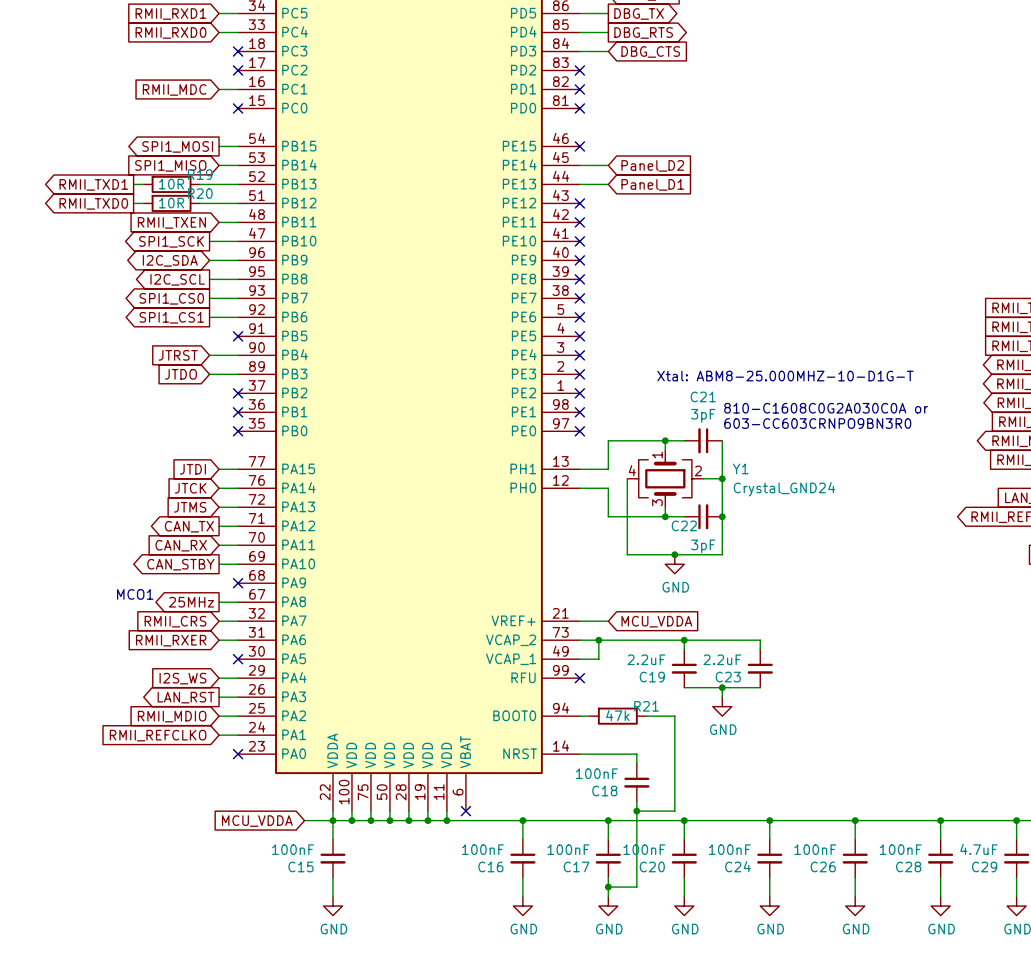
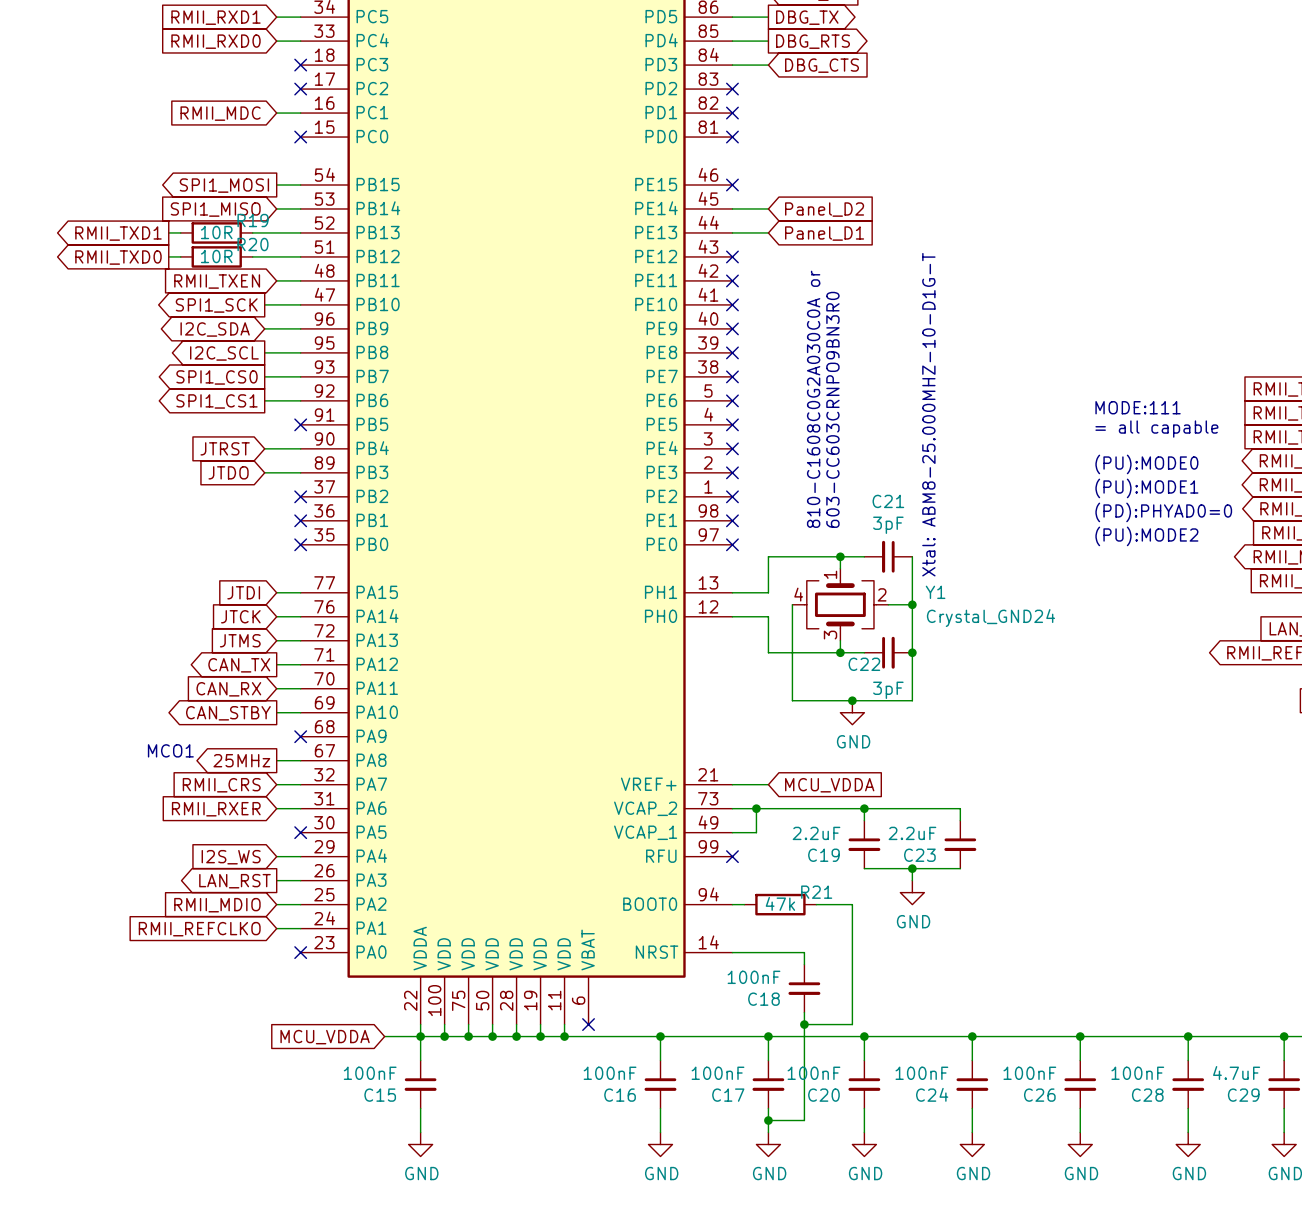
text: none -> MODE:111 (1138, 407)
text: none -> = all capable (1156, 429)
text: none -> (PU):MODE0 (1146, 464)
text rotation: 0° (785, 376) -> 90° counterclockwise (928, 414)
text: none -> (PU):MODE1 (1146, 488)
text: none -> (PD):PHYAD0=0 (1163, 512)
text rotation: 0° (826, 408) -> 90° counterclockwise (813, 399)
text rotation: 0° (817, 423) -> 90° counterclockwise (832, 409)
text: none -> (PU):MODE2 (1146, 536)

